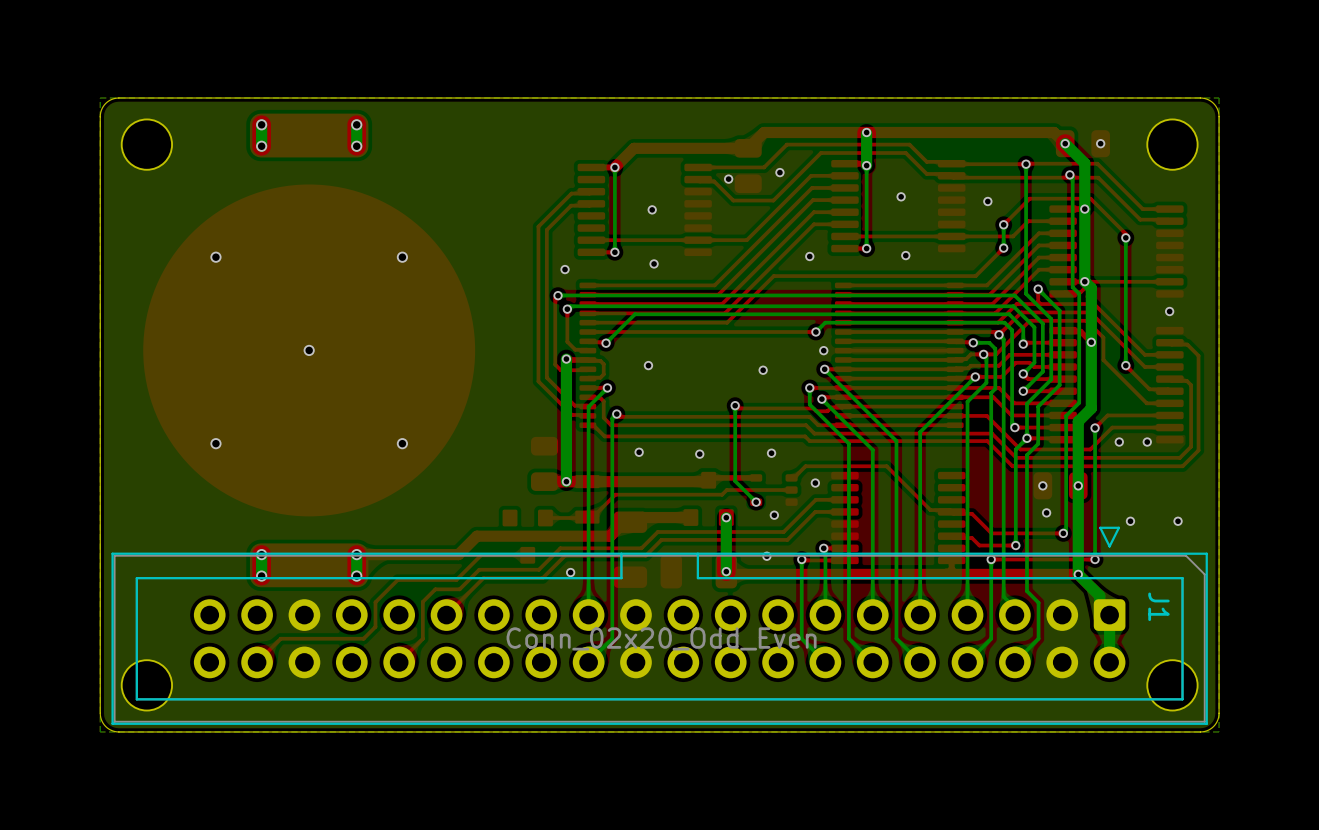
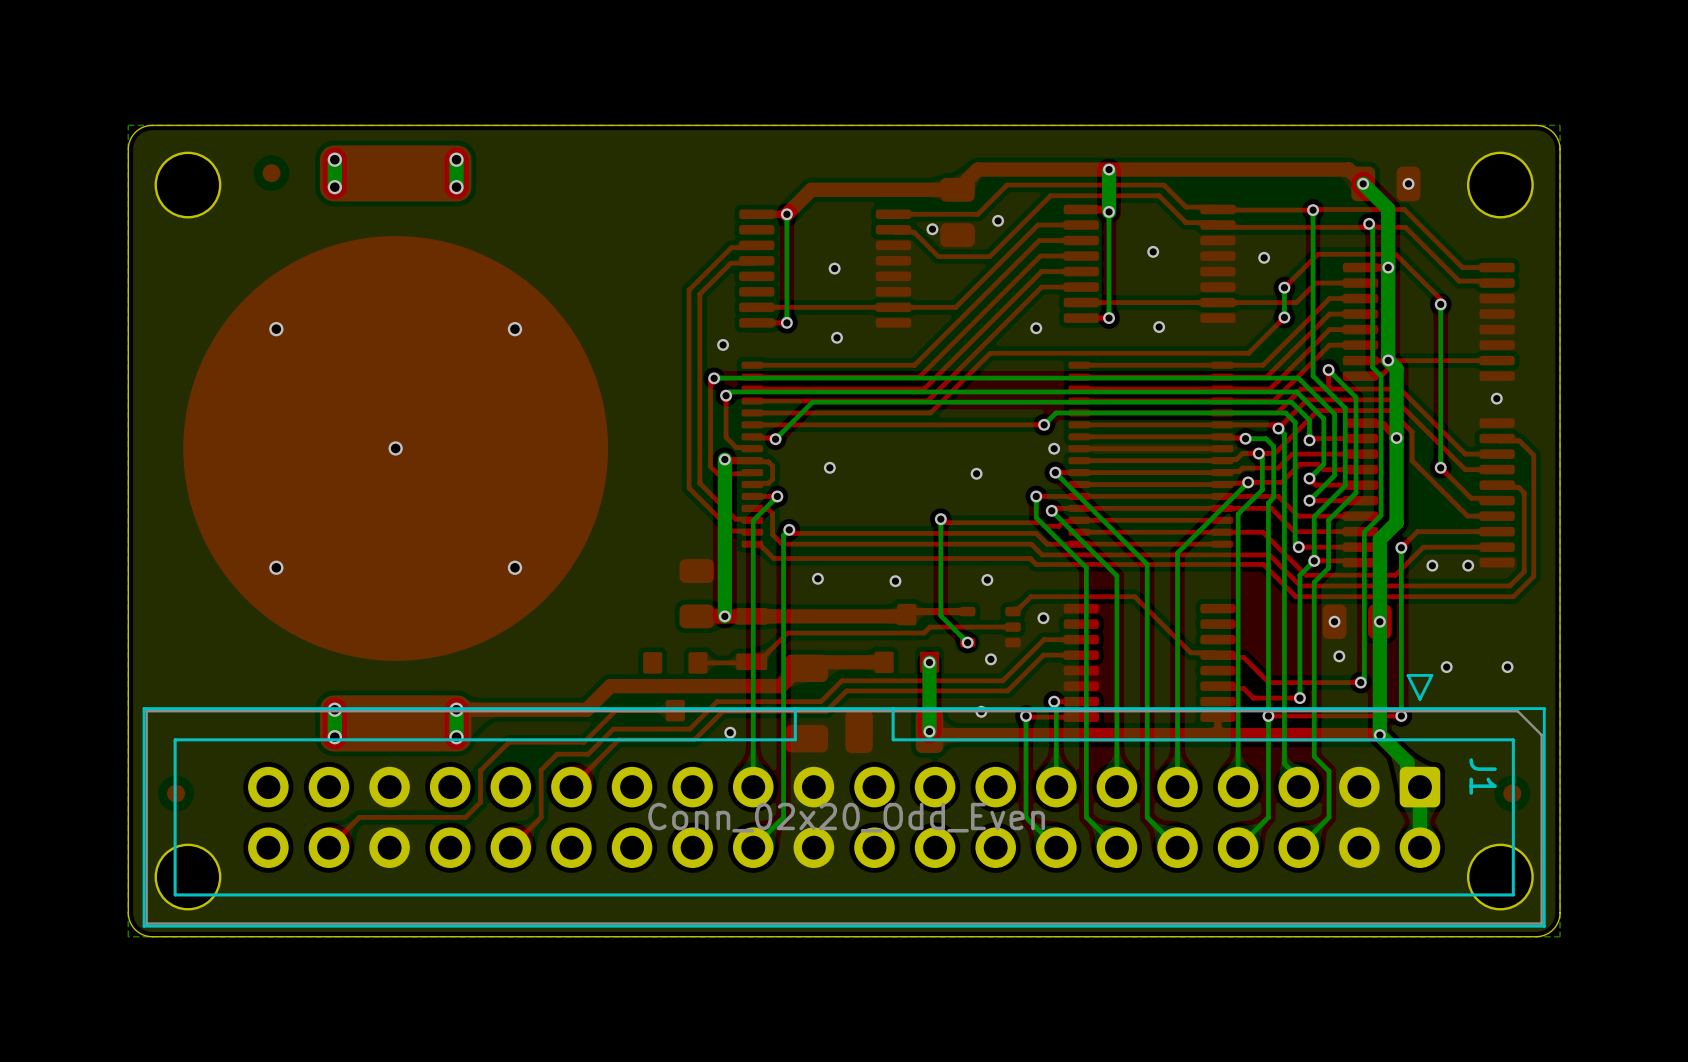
part: none -> (271, 173)
part: none -> (176, 793)
part: none -> (1512, 793)

